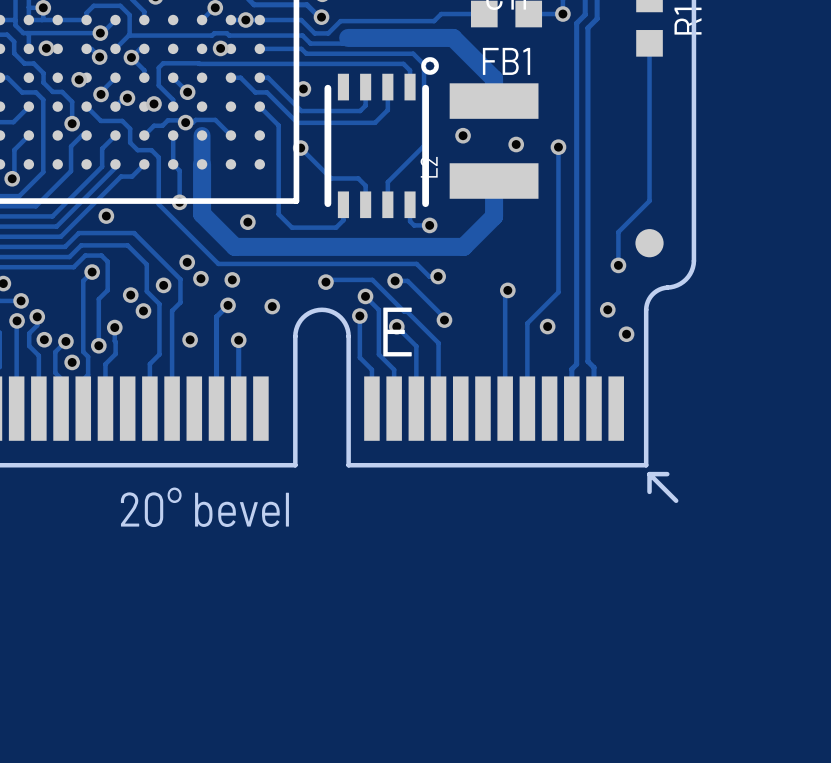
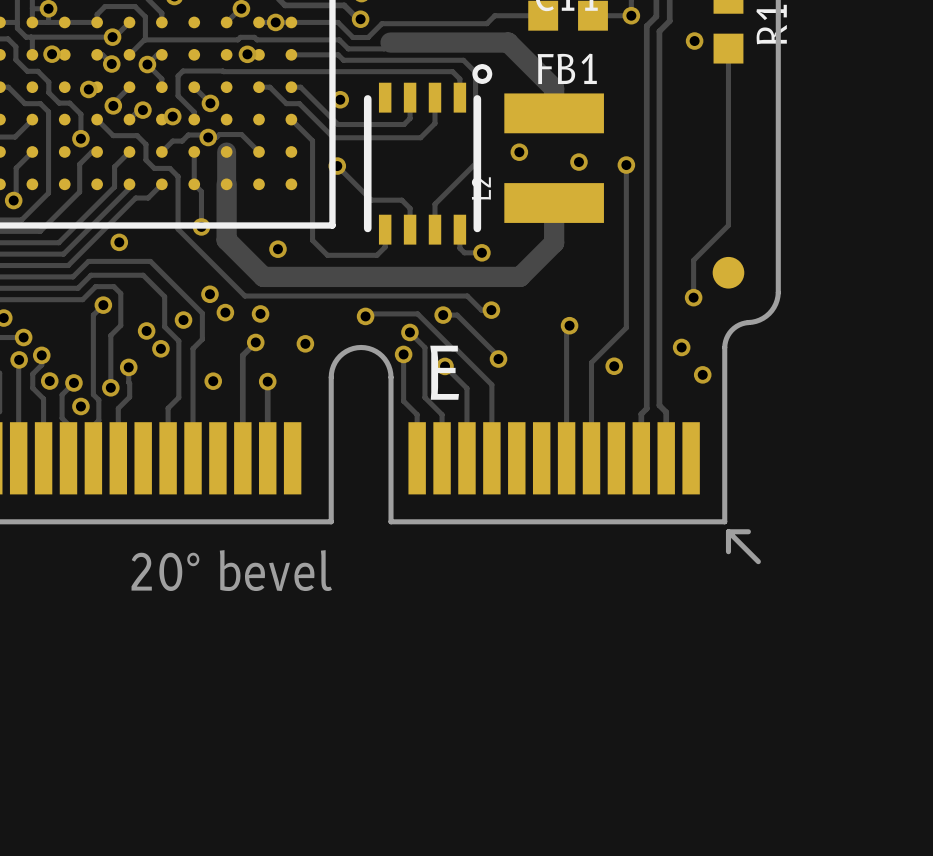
via: none -> (694, 41)

